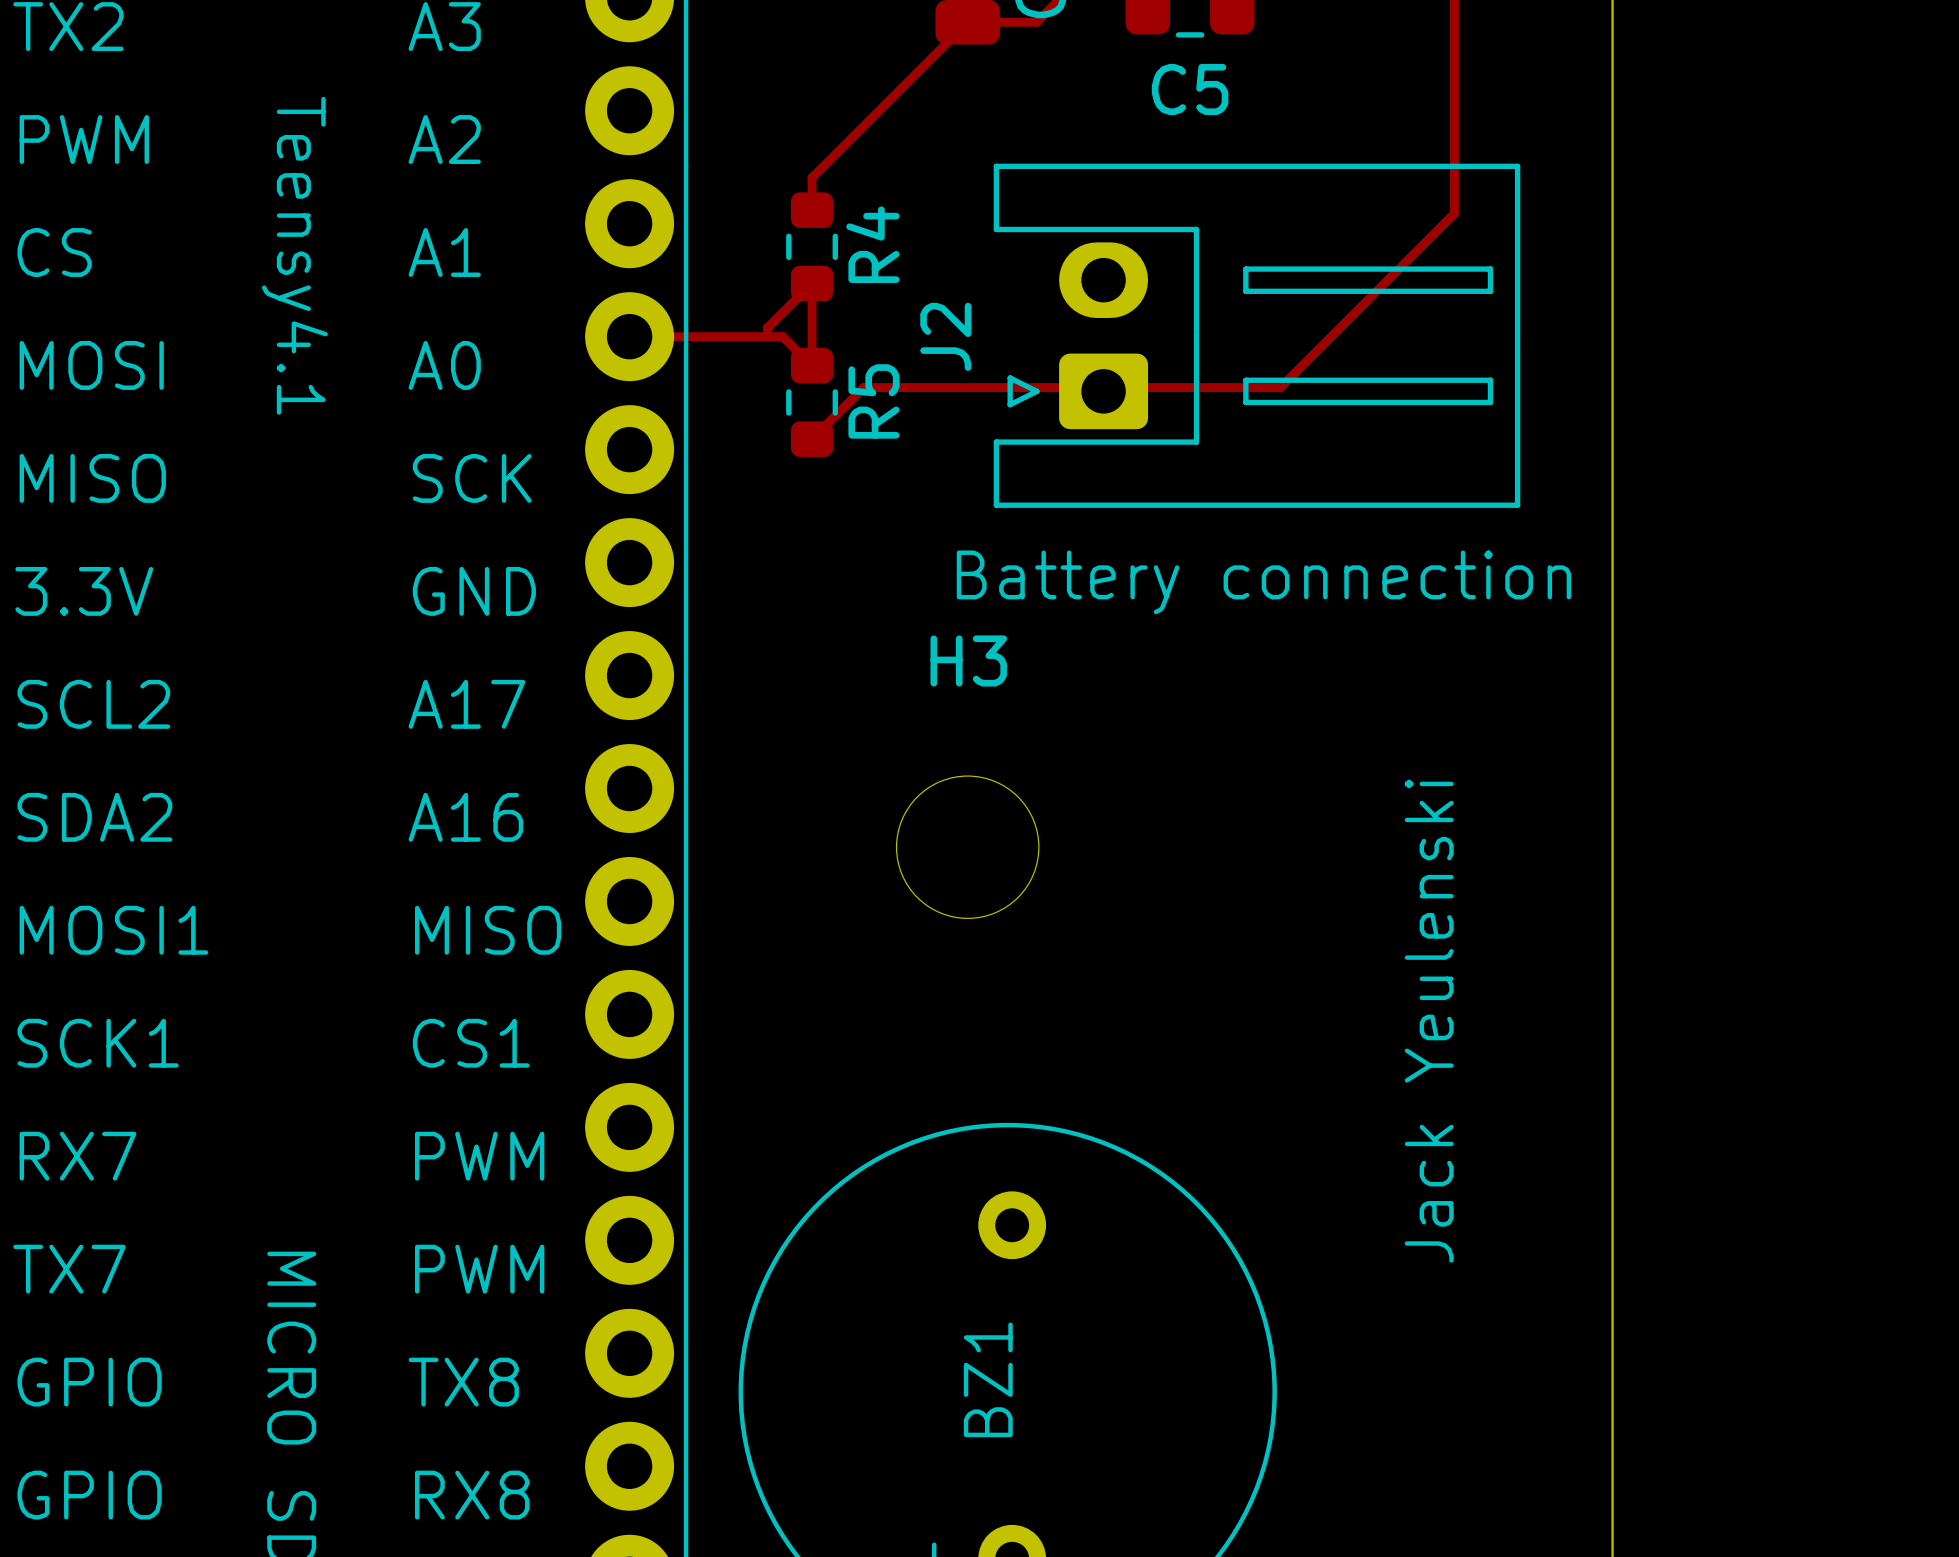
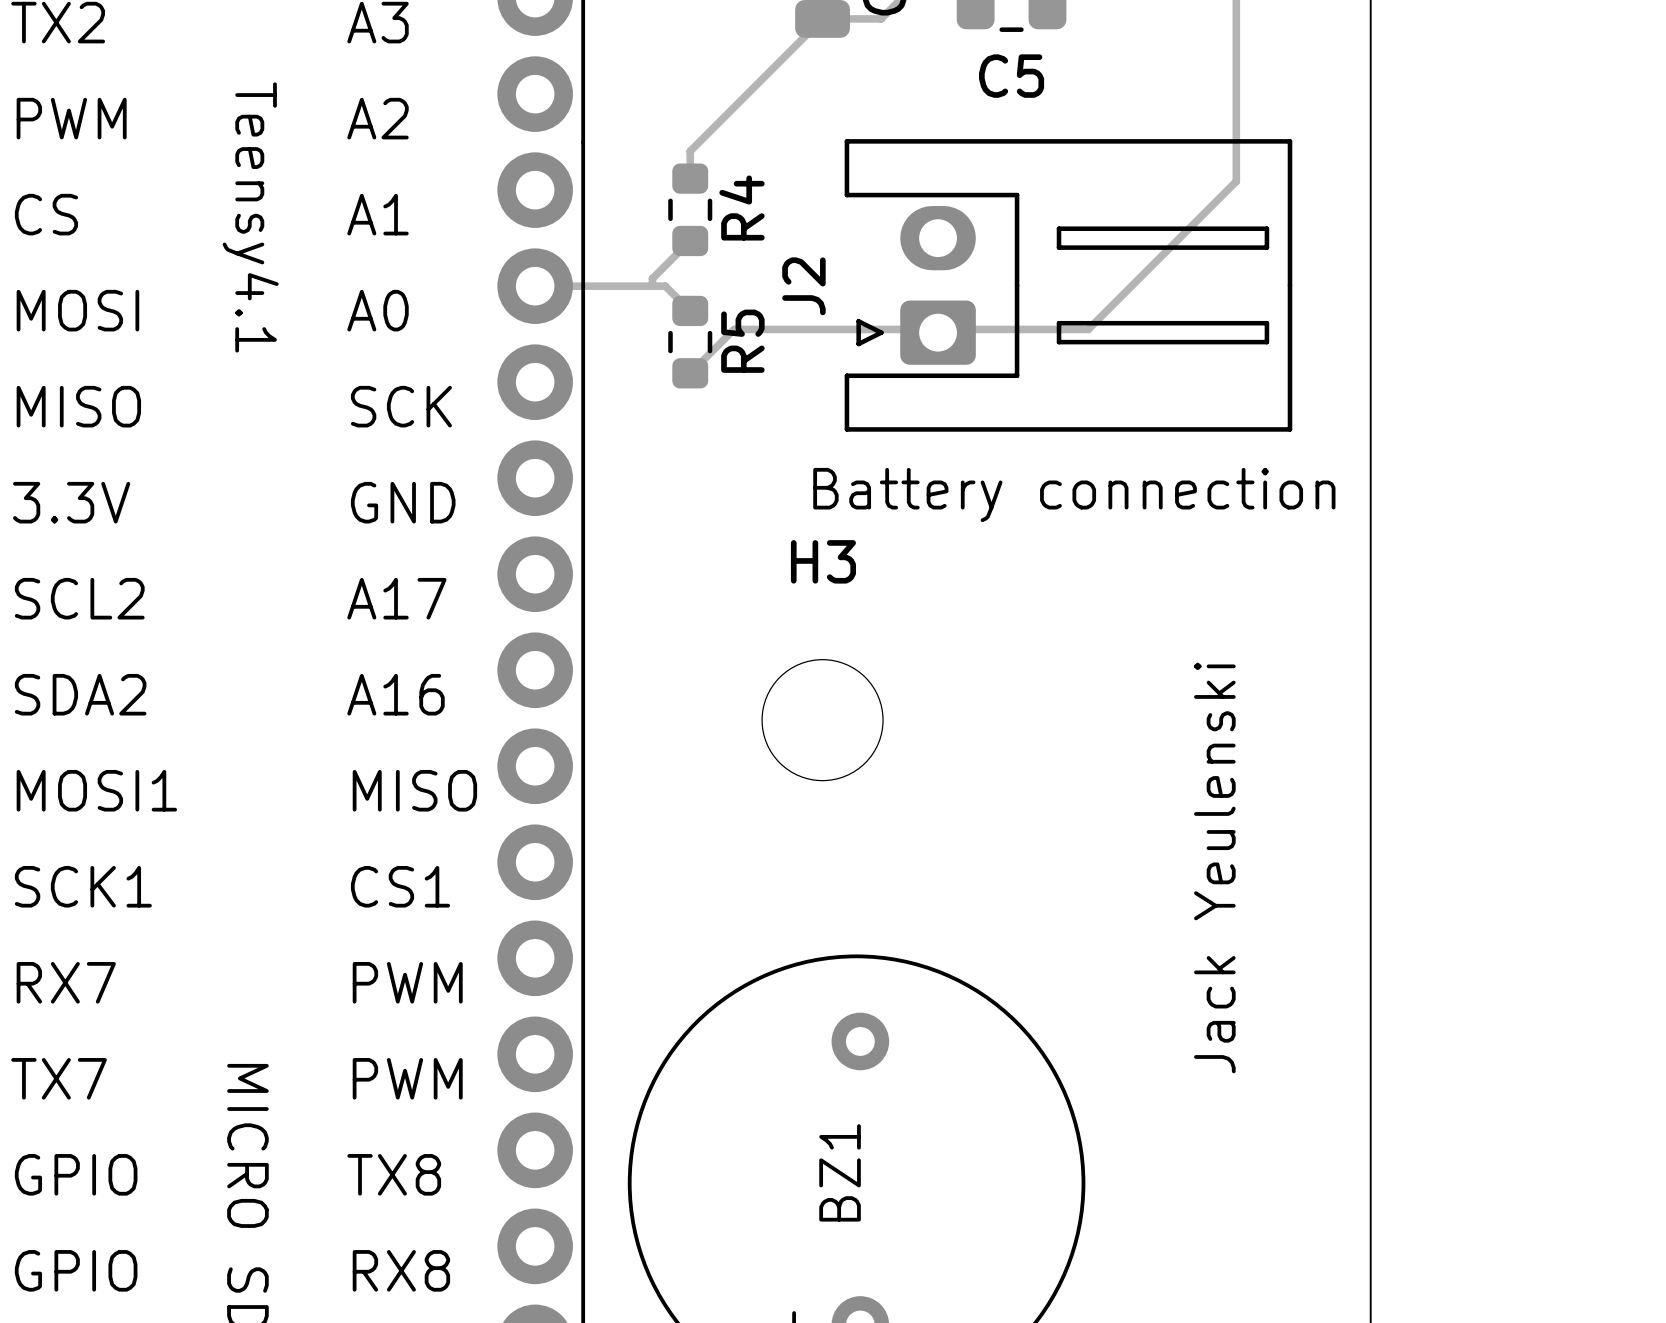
track: (812, 283) (812, 365) -> none

